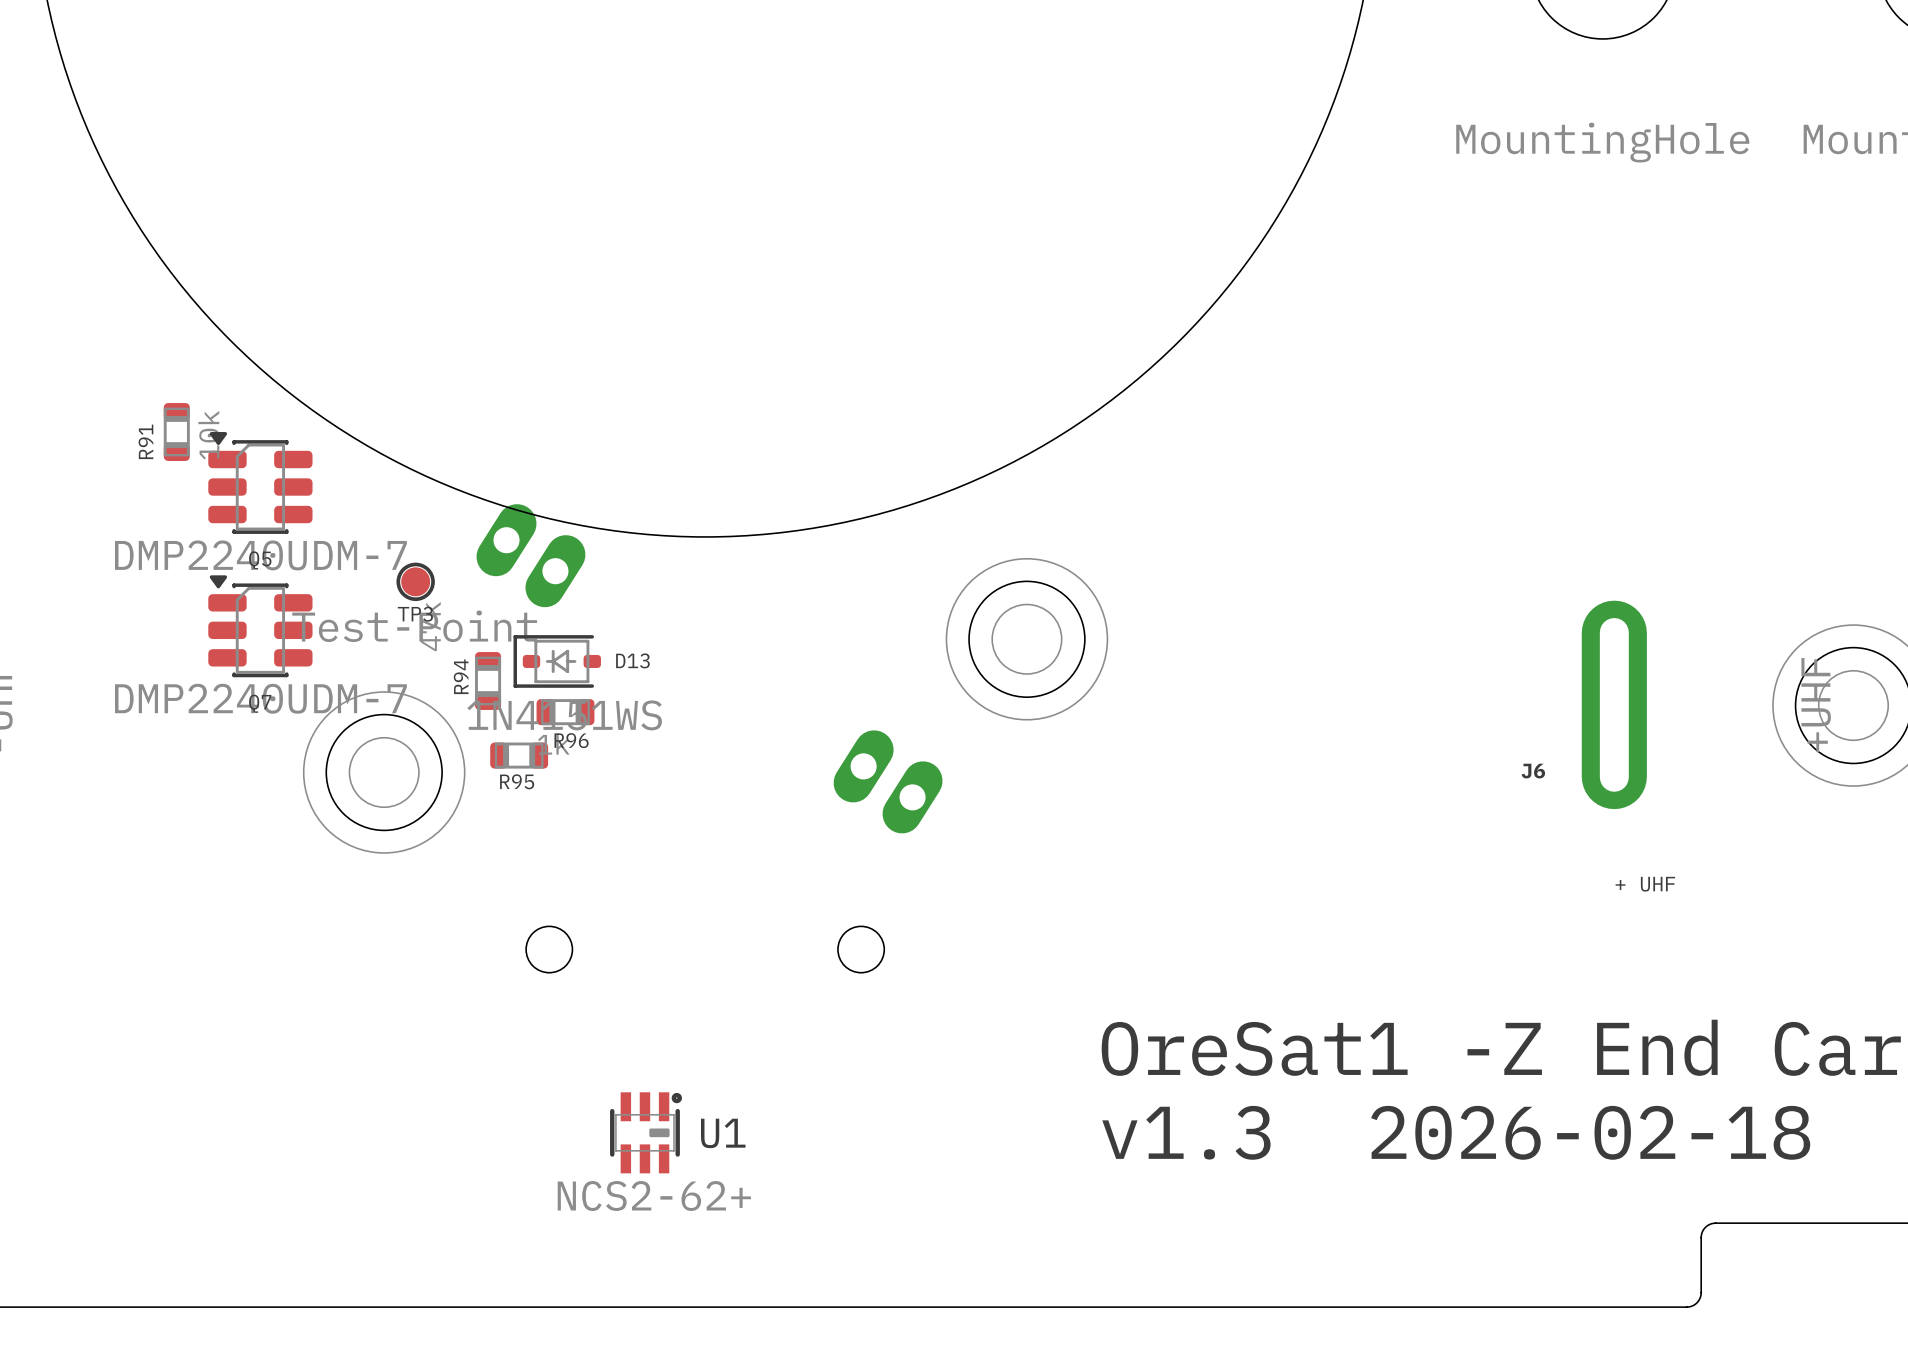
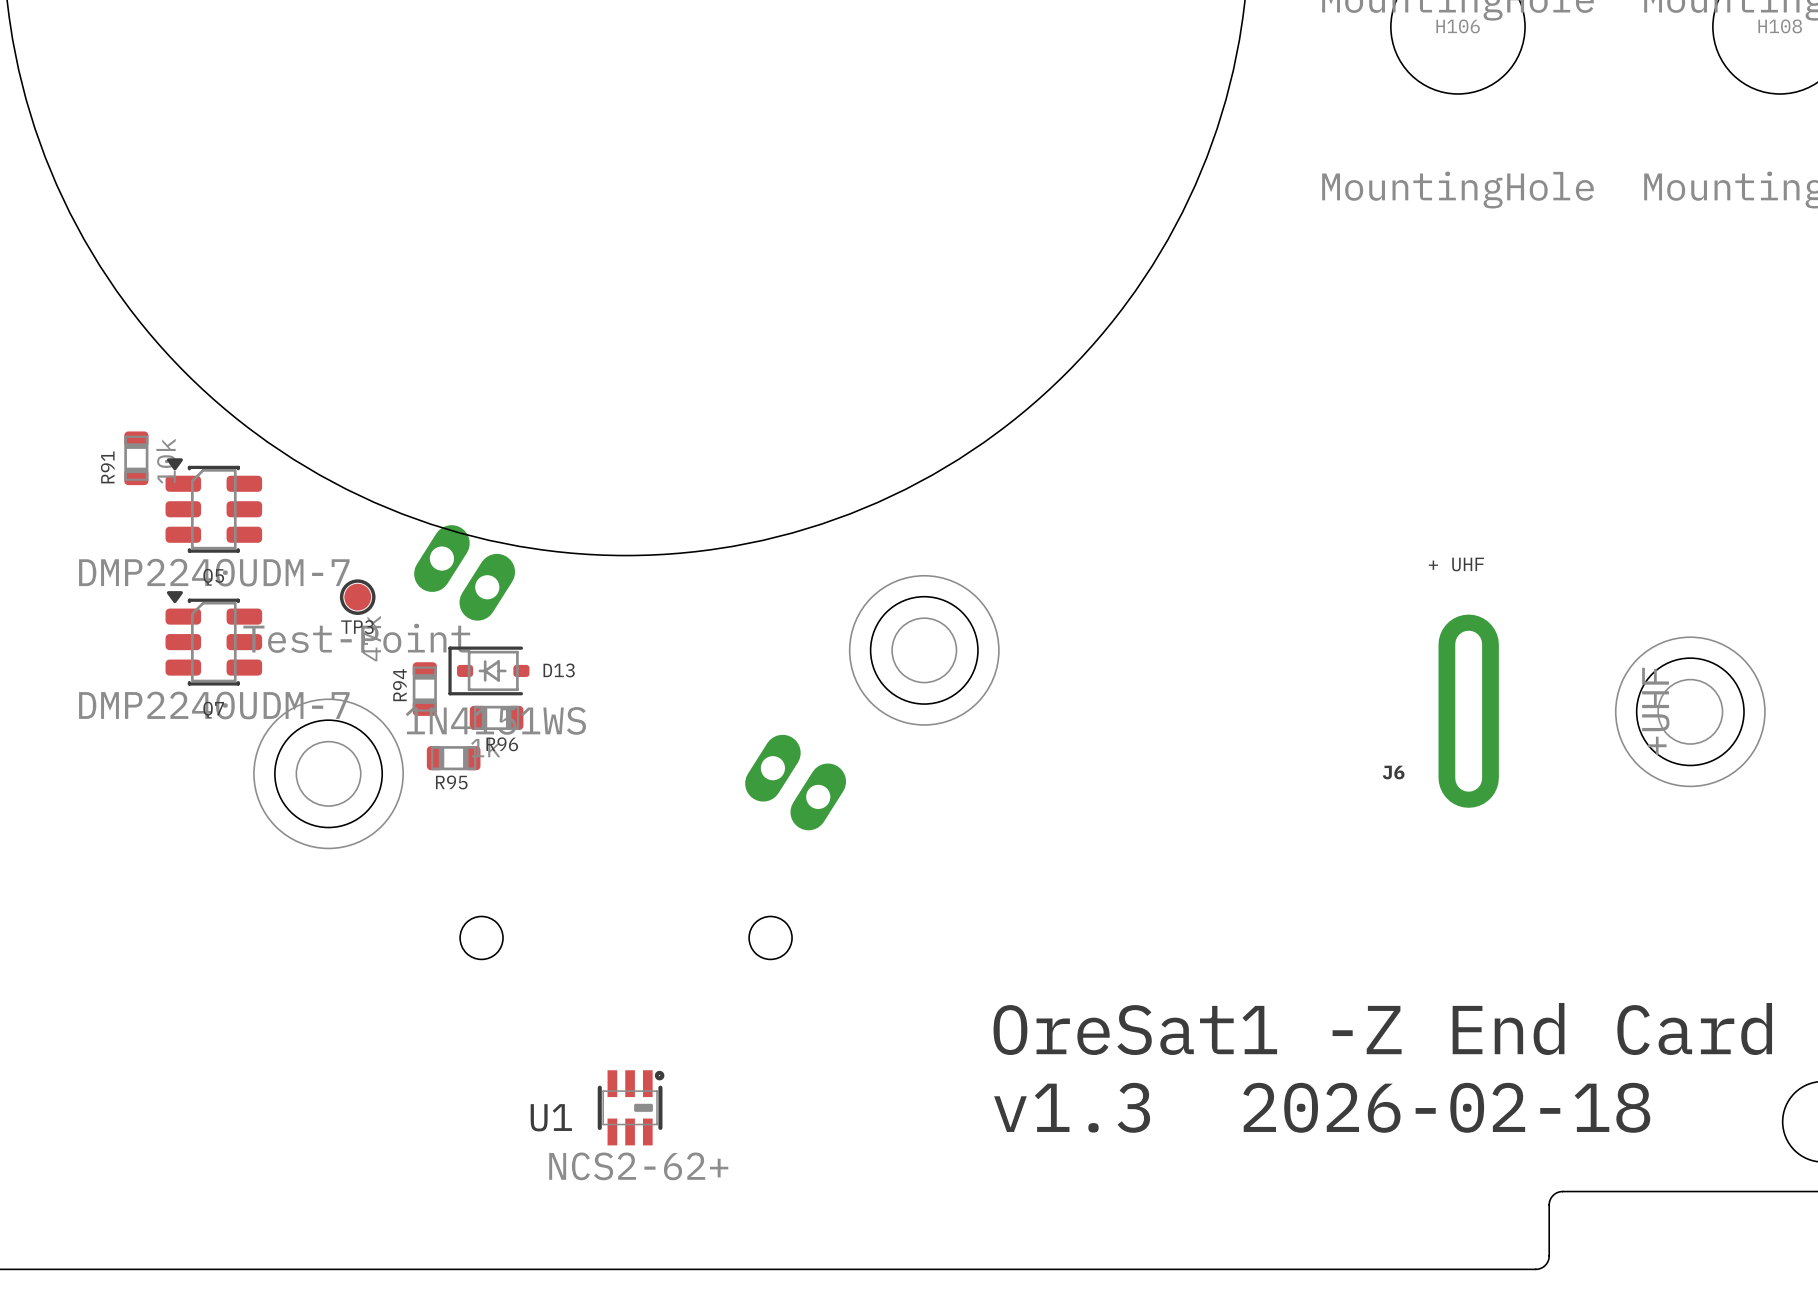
text position: + UHF (1645, 884) -> + UHF (1456, 564)
U1 position: (646, 1132) -> (631, 1107)
U1 name position: U1 (723, 1133) -> U1 (551, 1117)

